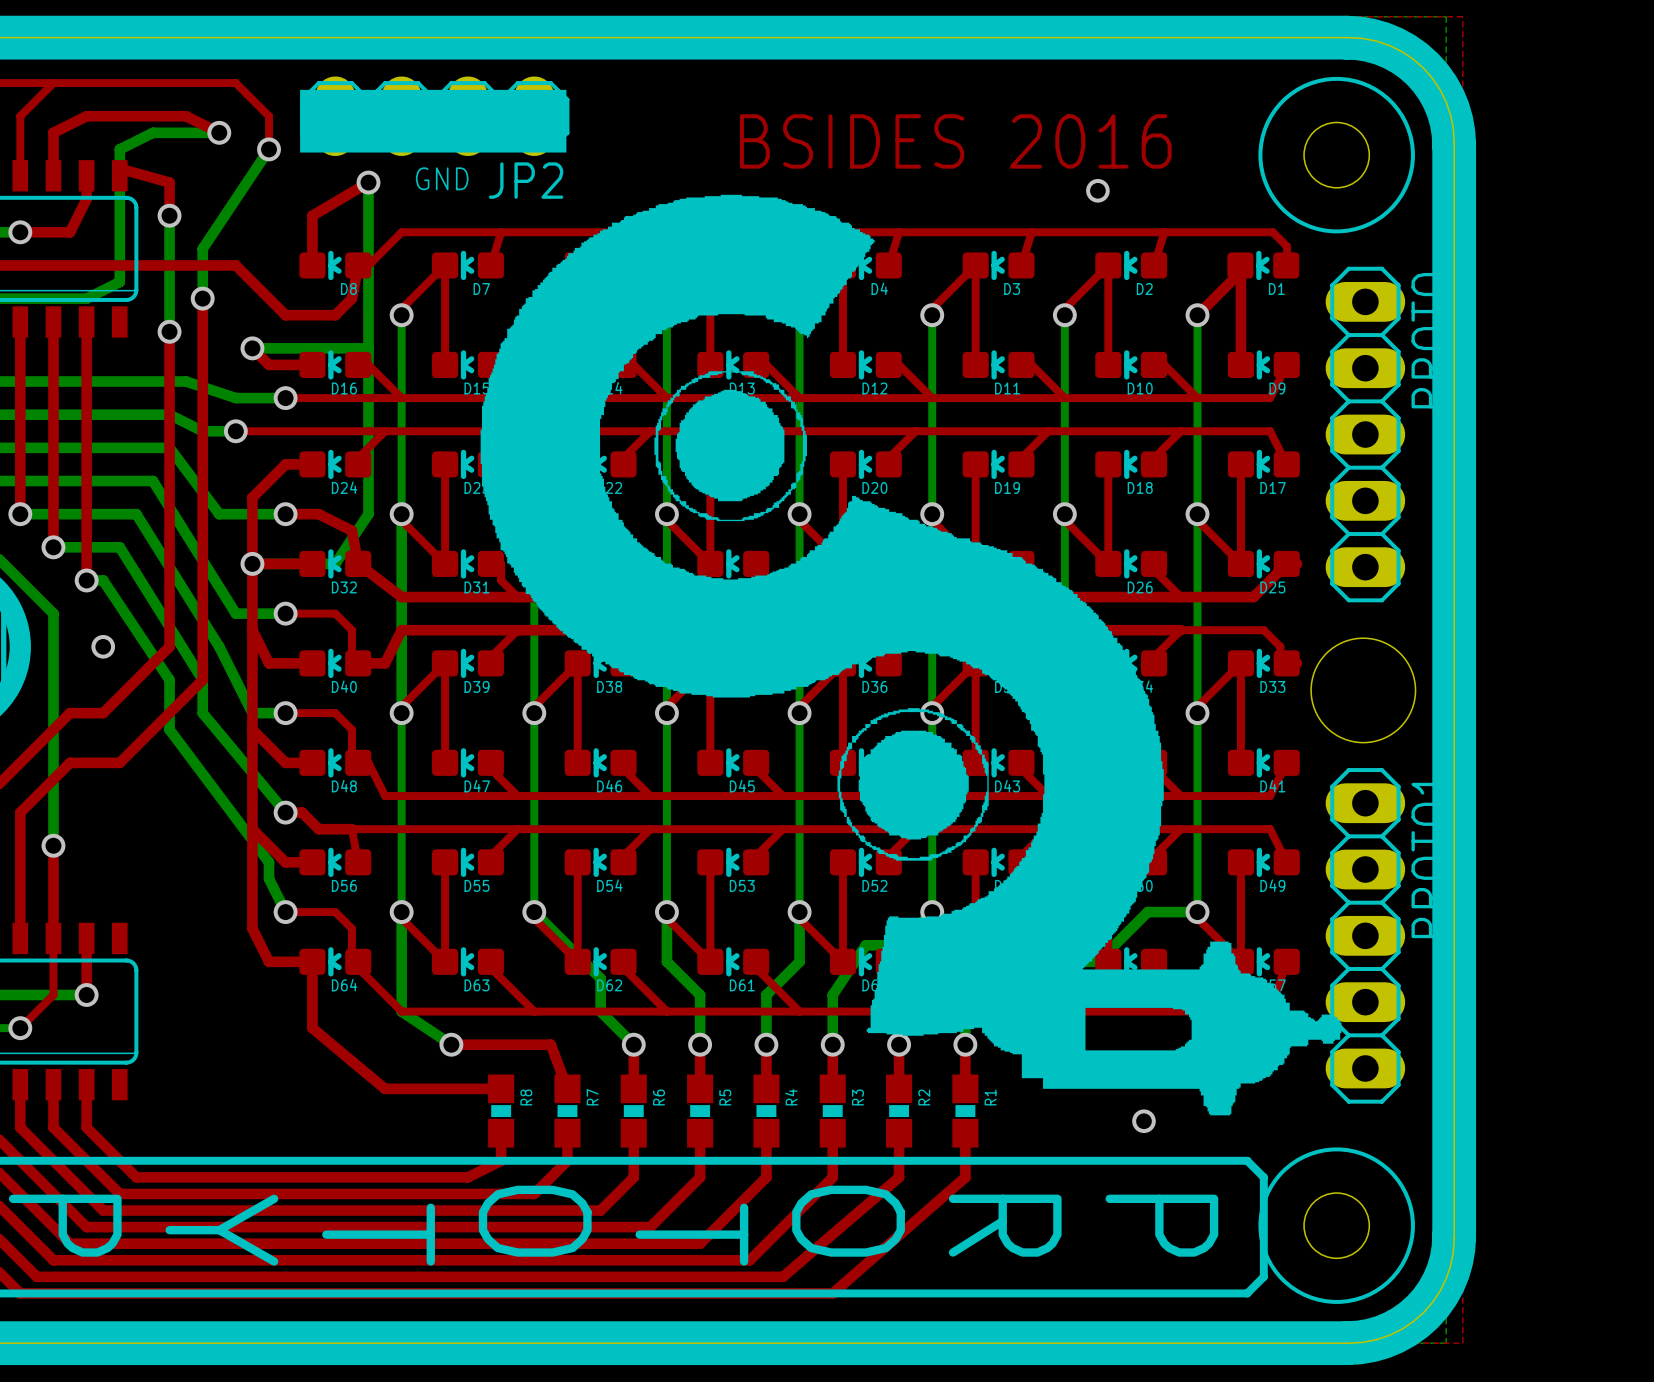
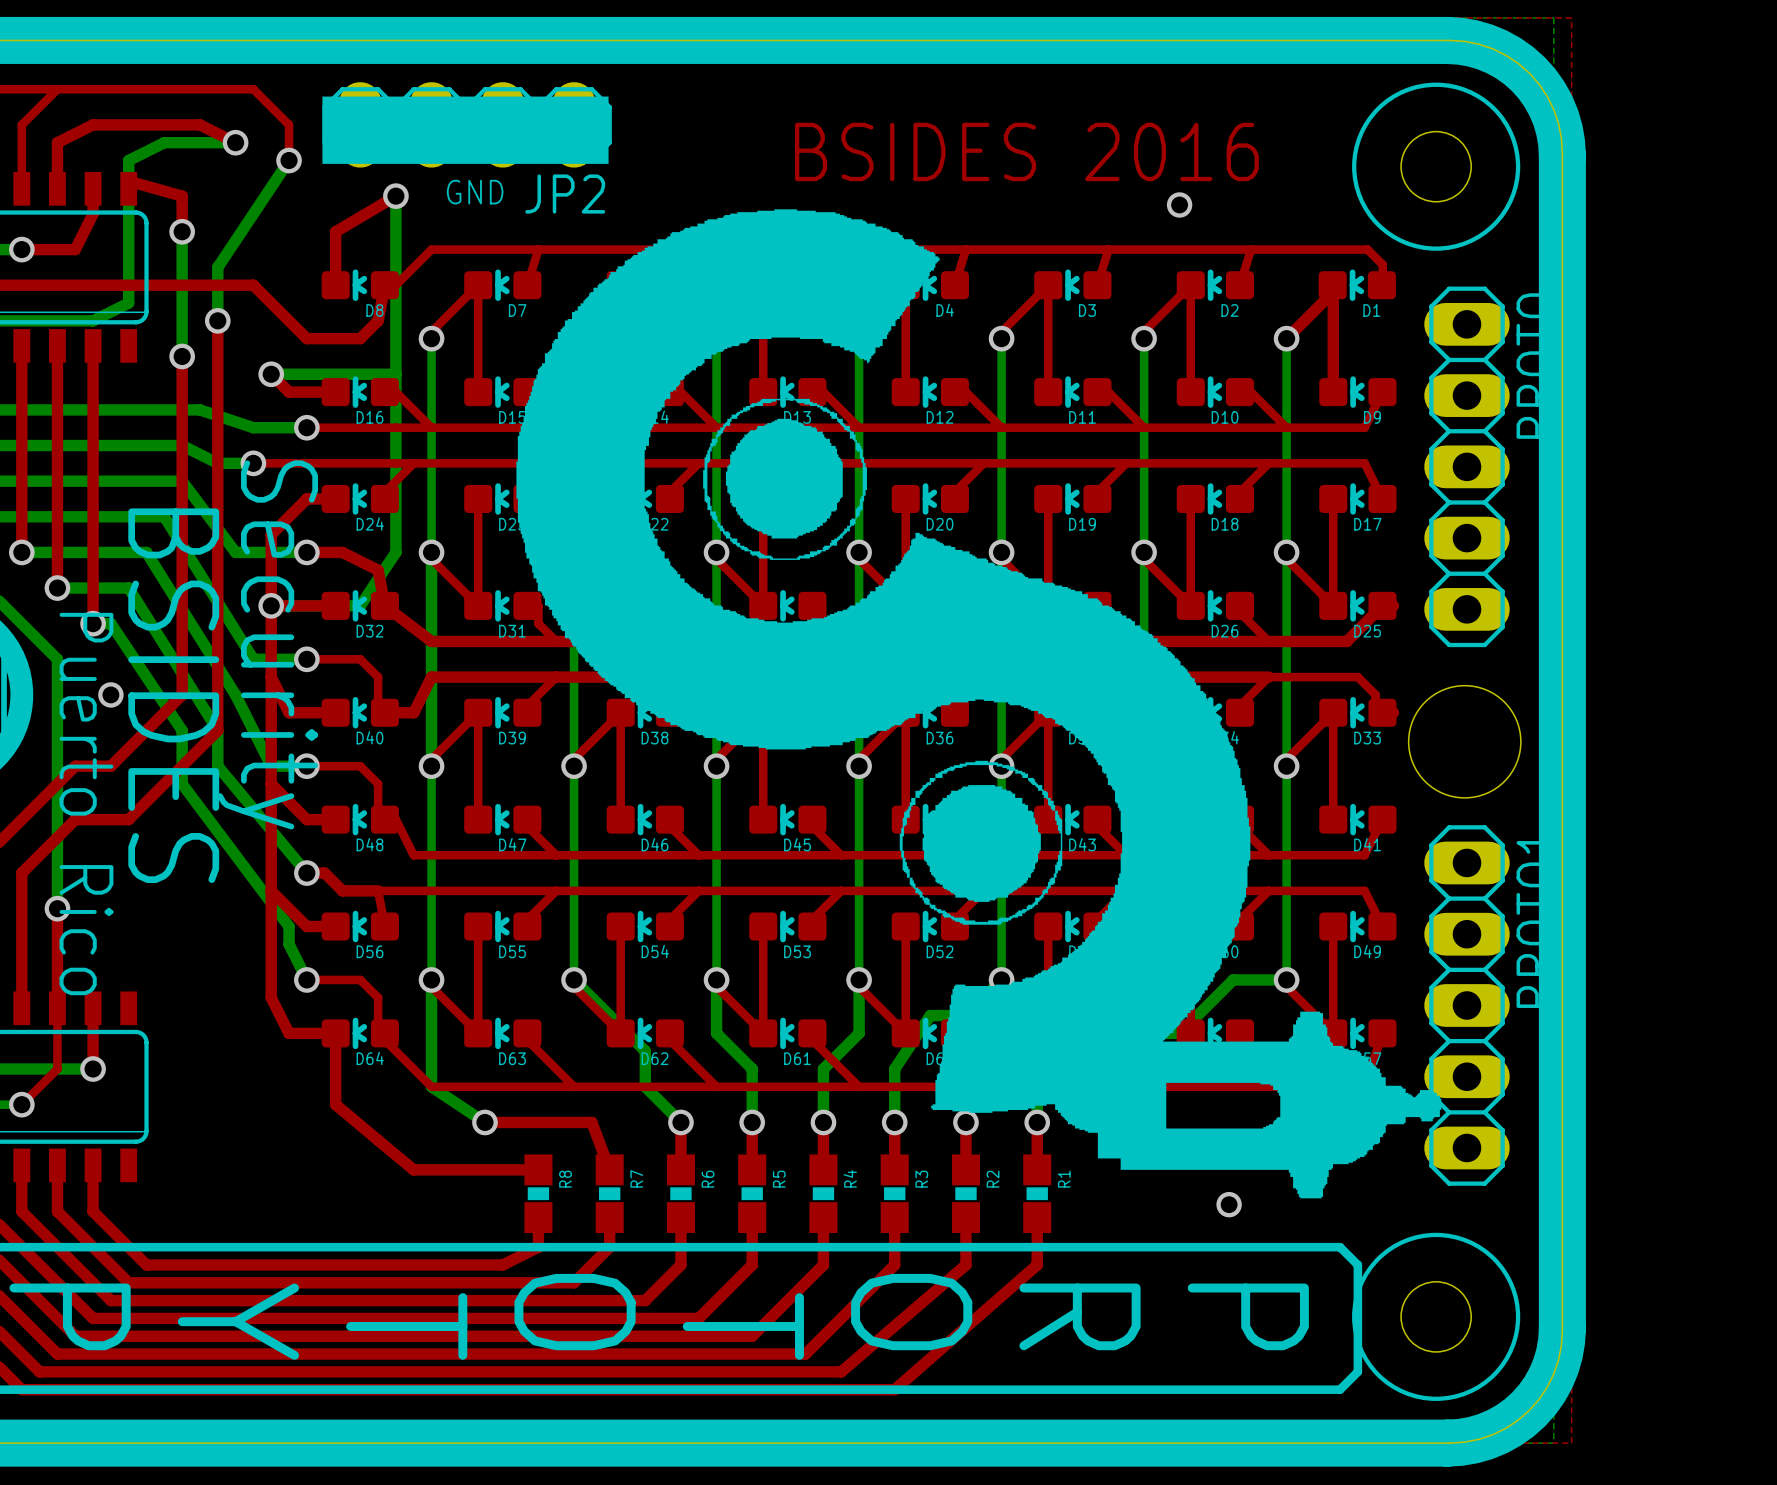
text: none -> Security (267, 644)
text: none -> BSIDES (173, 695)
text: none -> Puerto Rico (86, 804)

